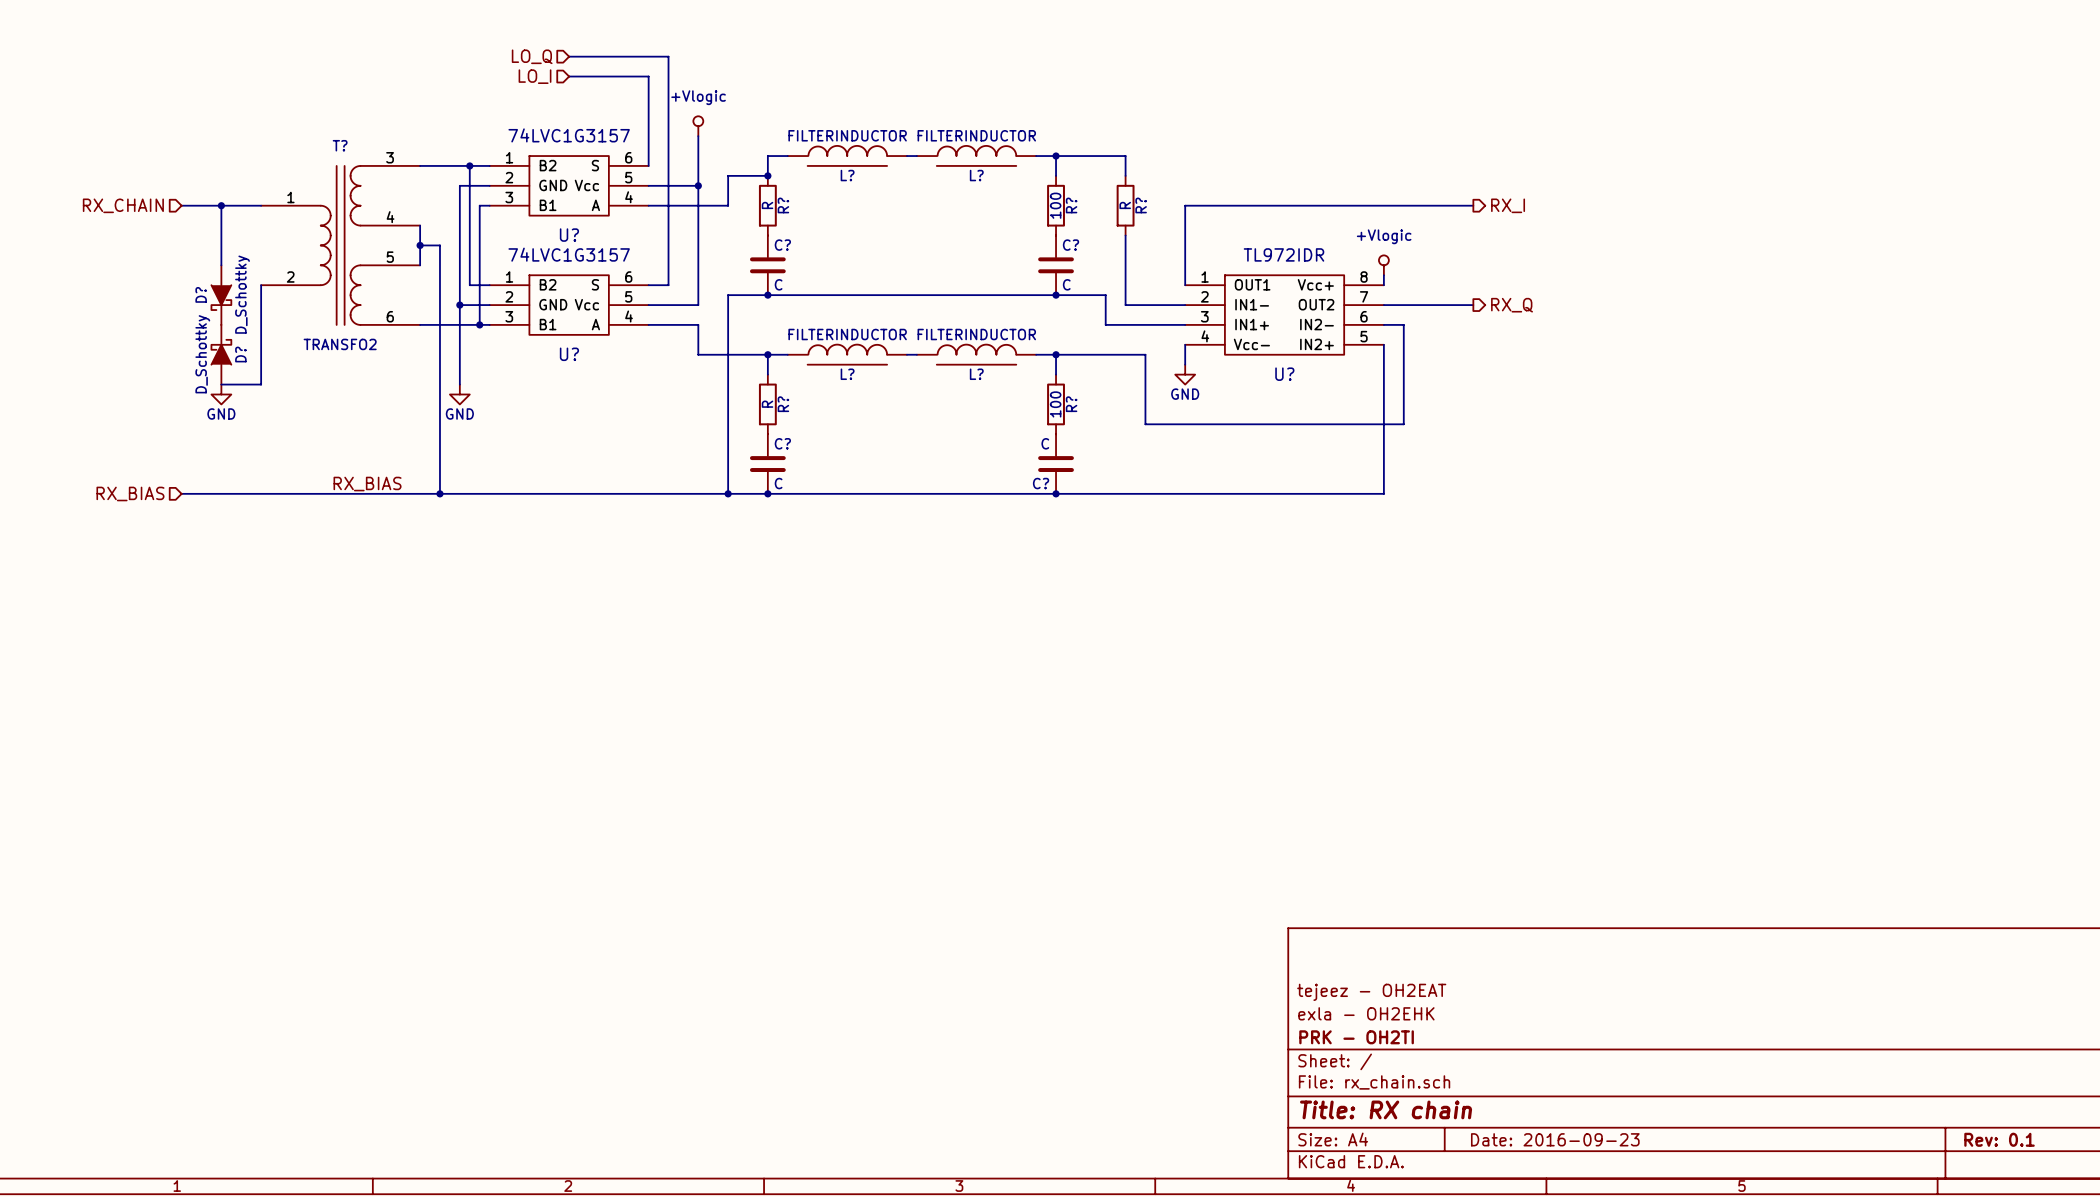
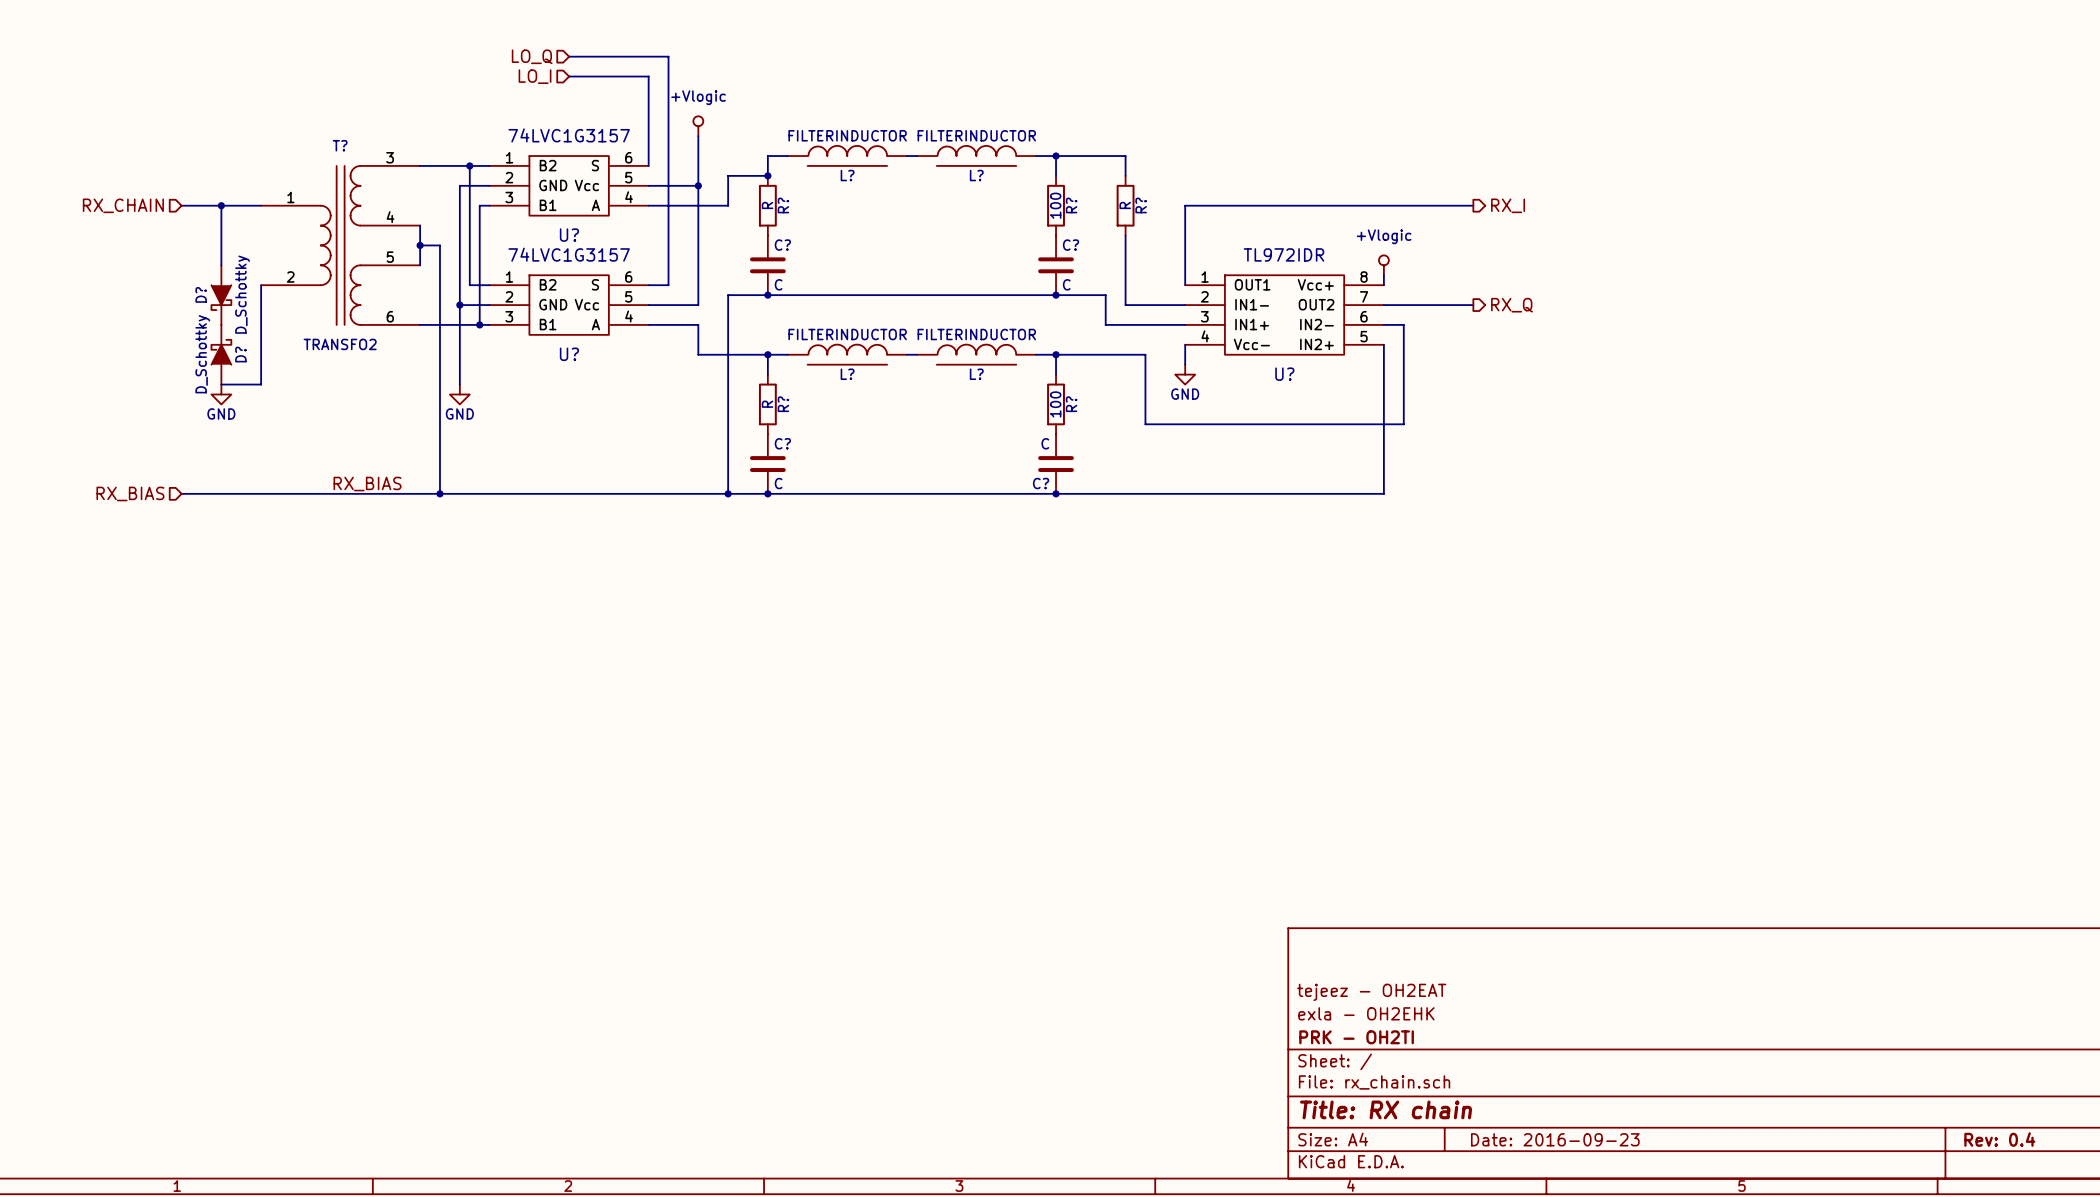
title block: Rev: 0.1 (1999, 1139) -> Rev: 0.4 (1999, 1139)

